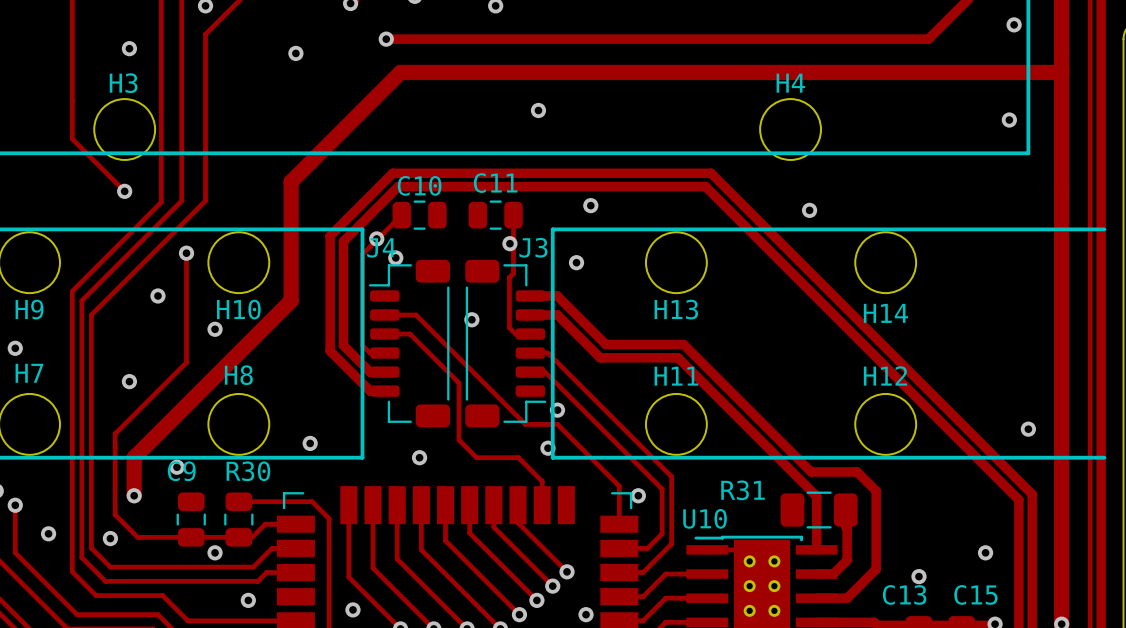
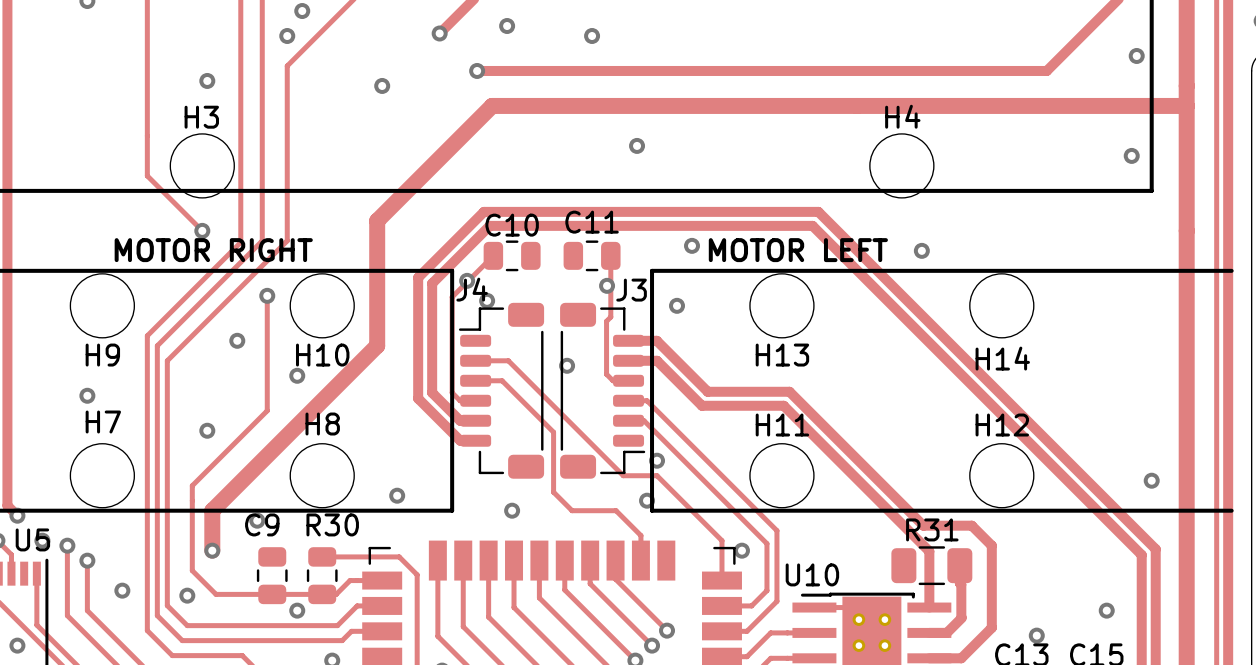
text: none -> MOTOR RIGHT (213, 250)
text: none -> MOTOR LEFT (798, 250)
R31 name position: R31 (743, 490) -> R31 (932, 529)

